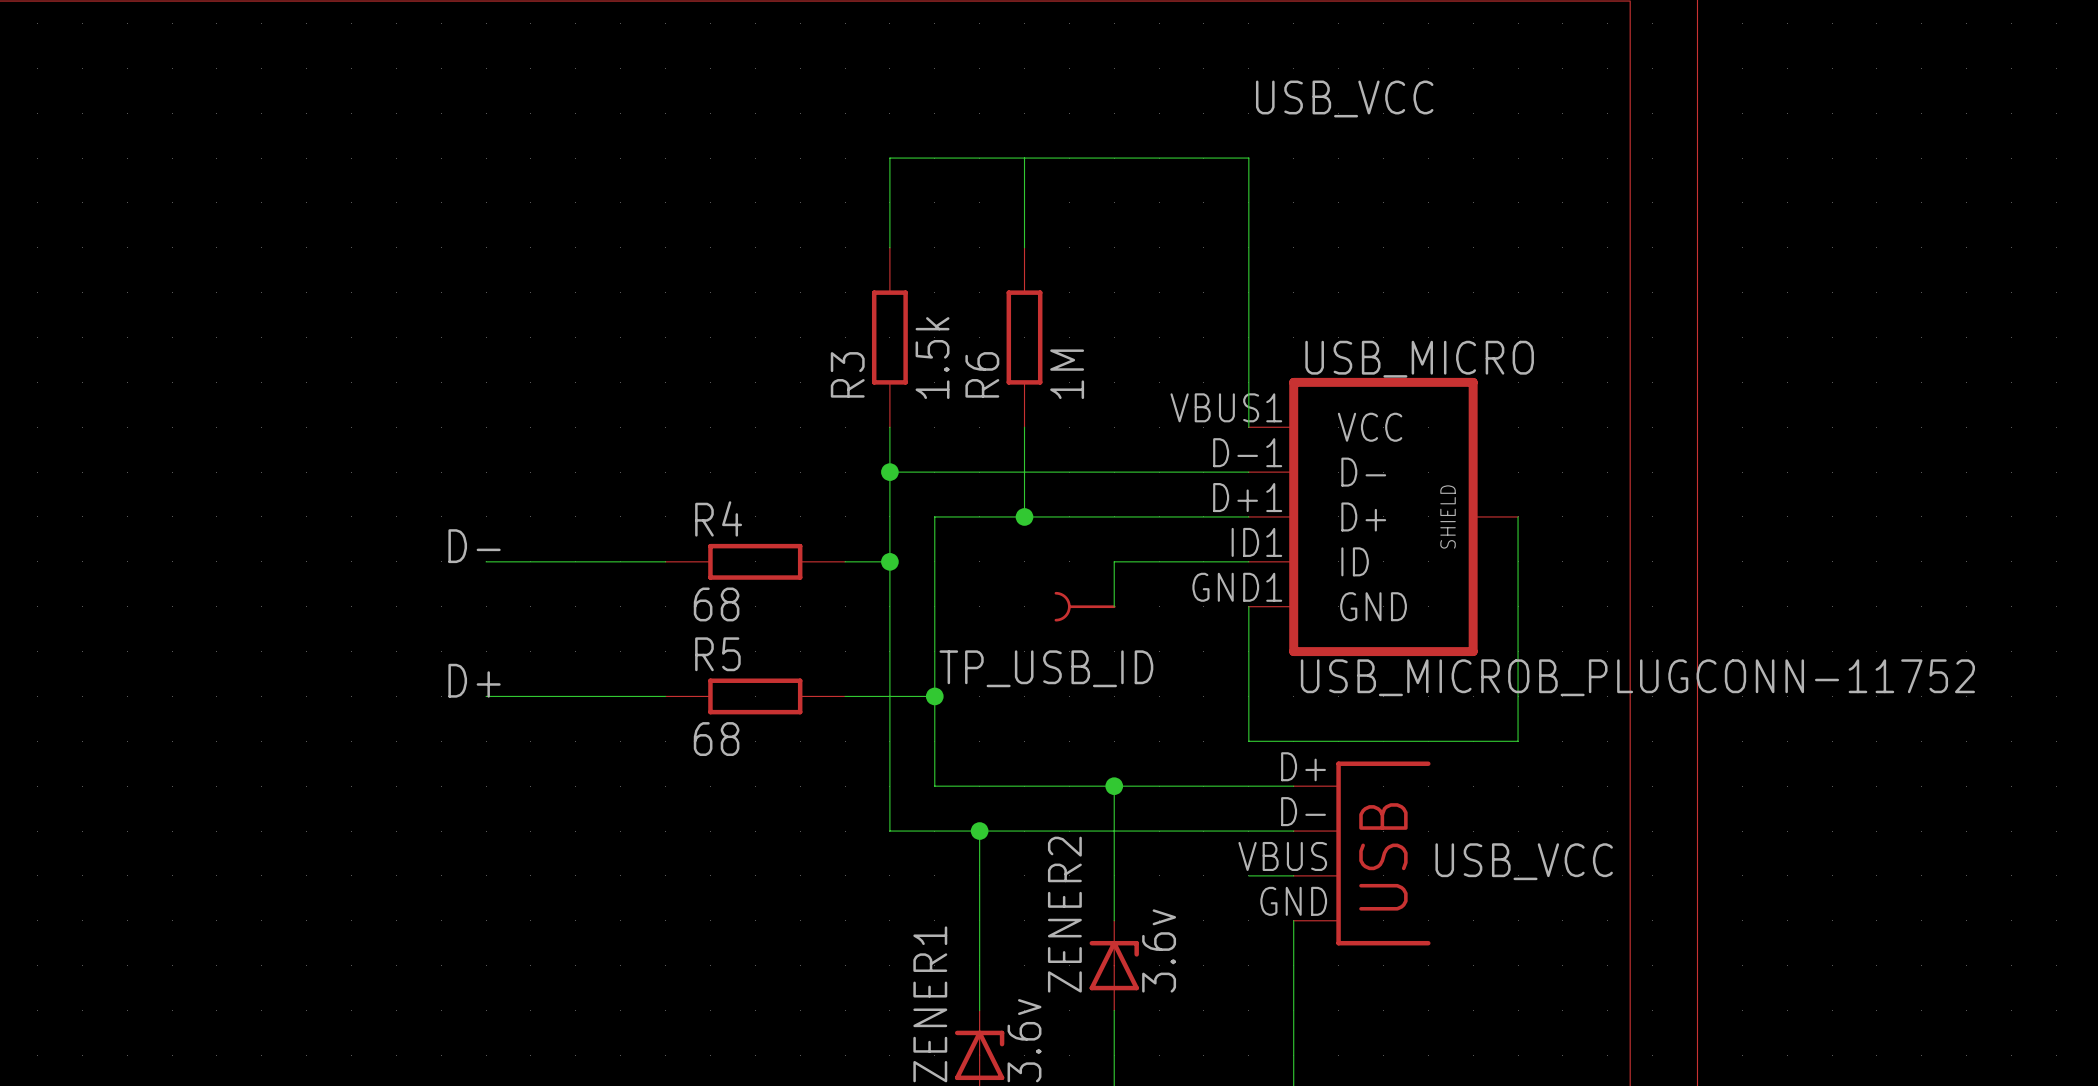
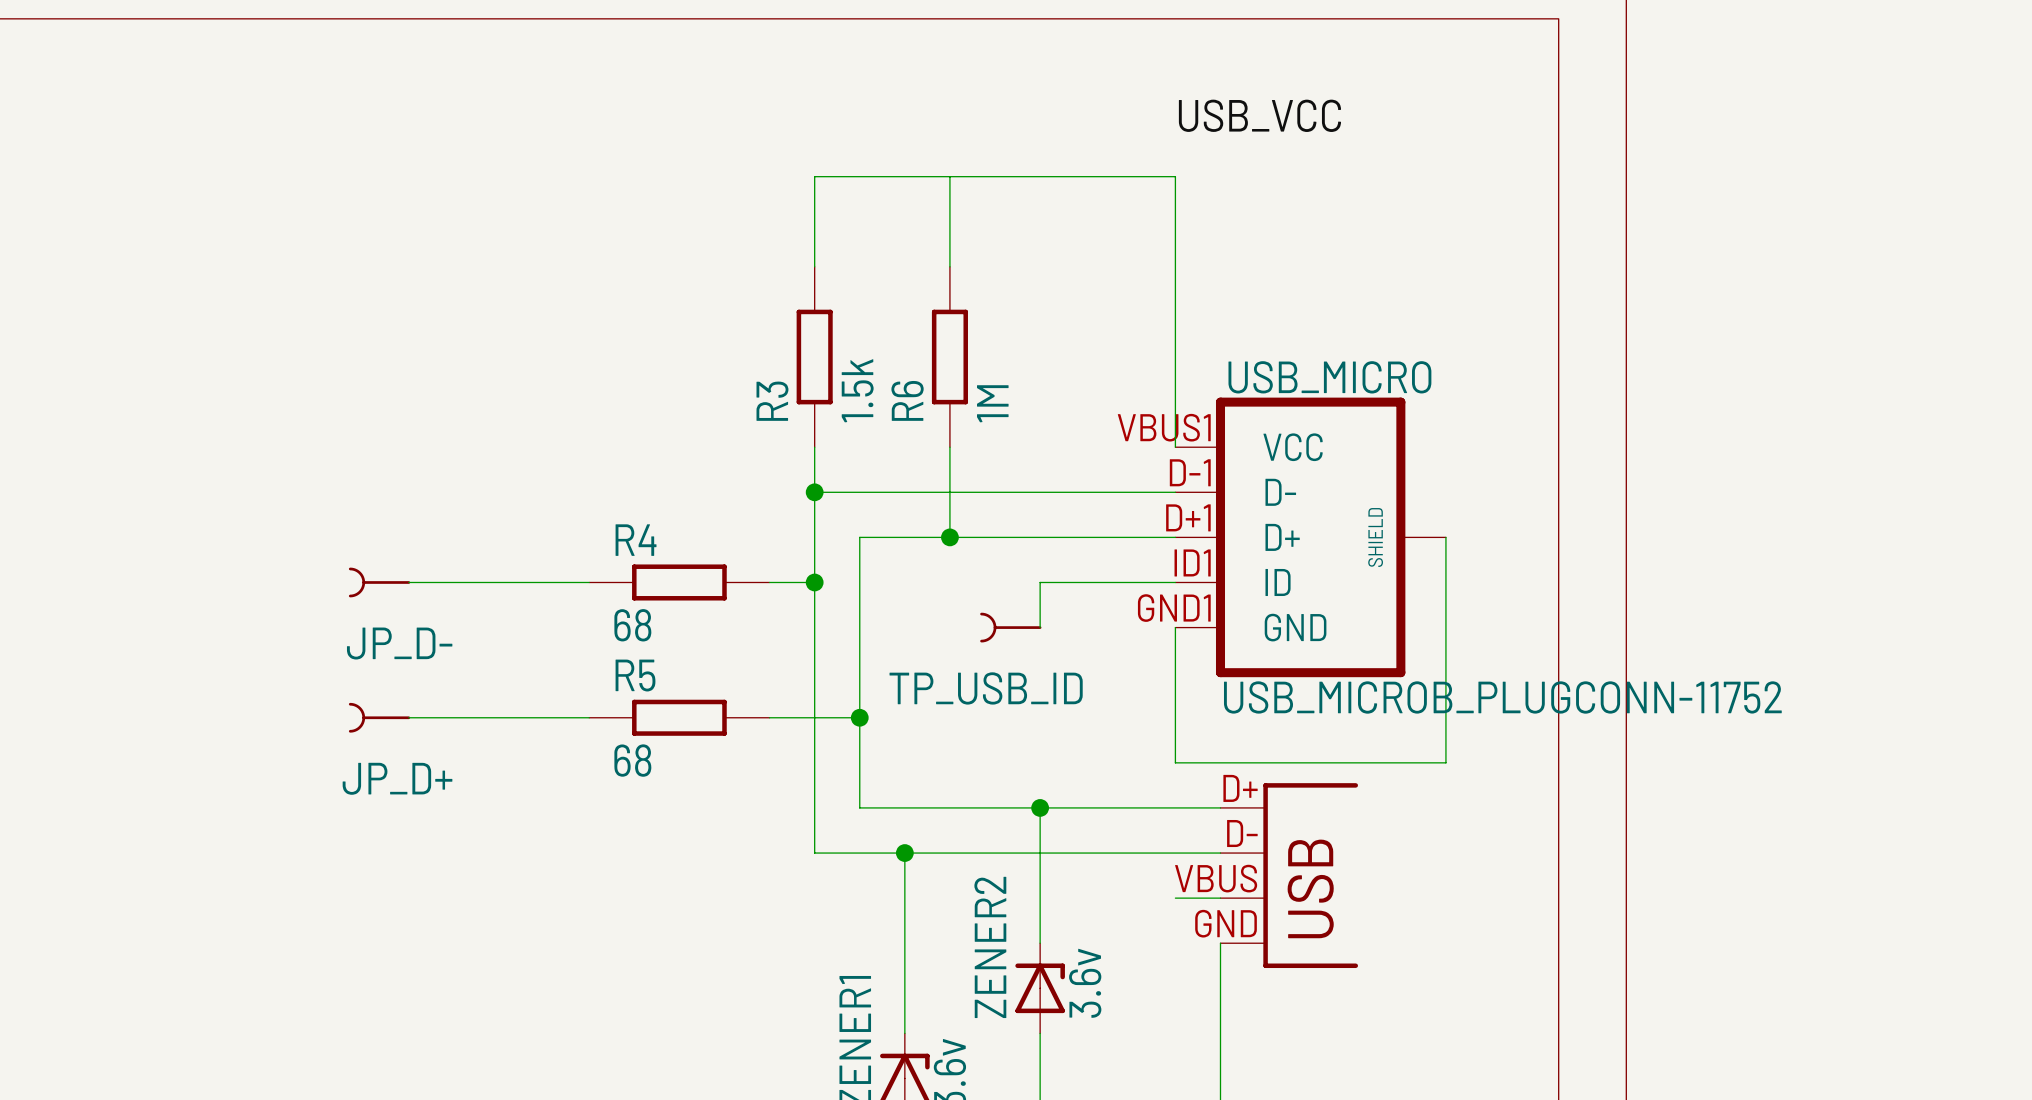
label: D- (474, 546) -> none
JP_D-: none -> (379, 582)
label: D+ (474, 680) -> none
JP_D+: none -> (379, 717)
label: USB_VCC (1524, 861) -> none

